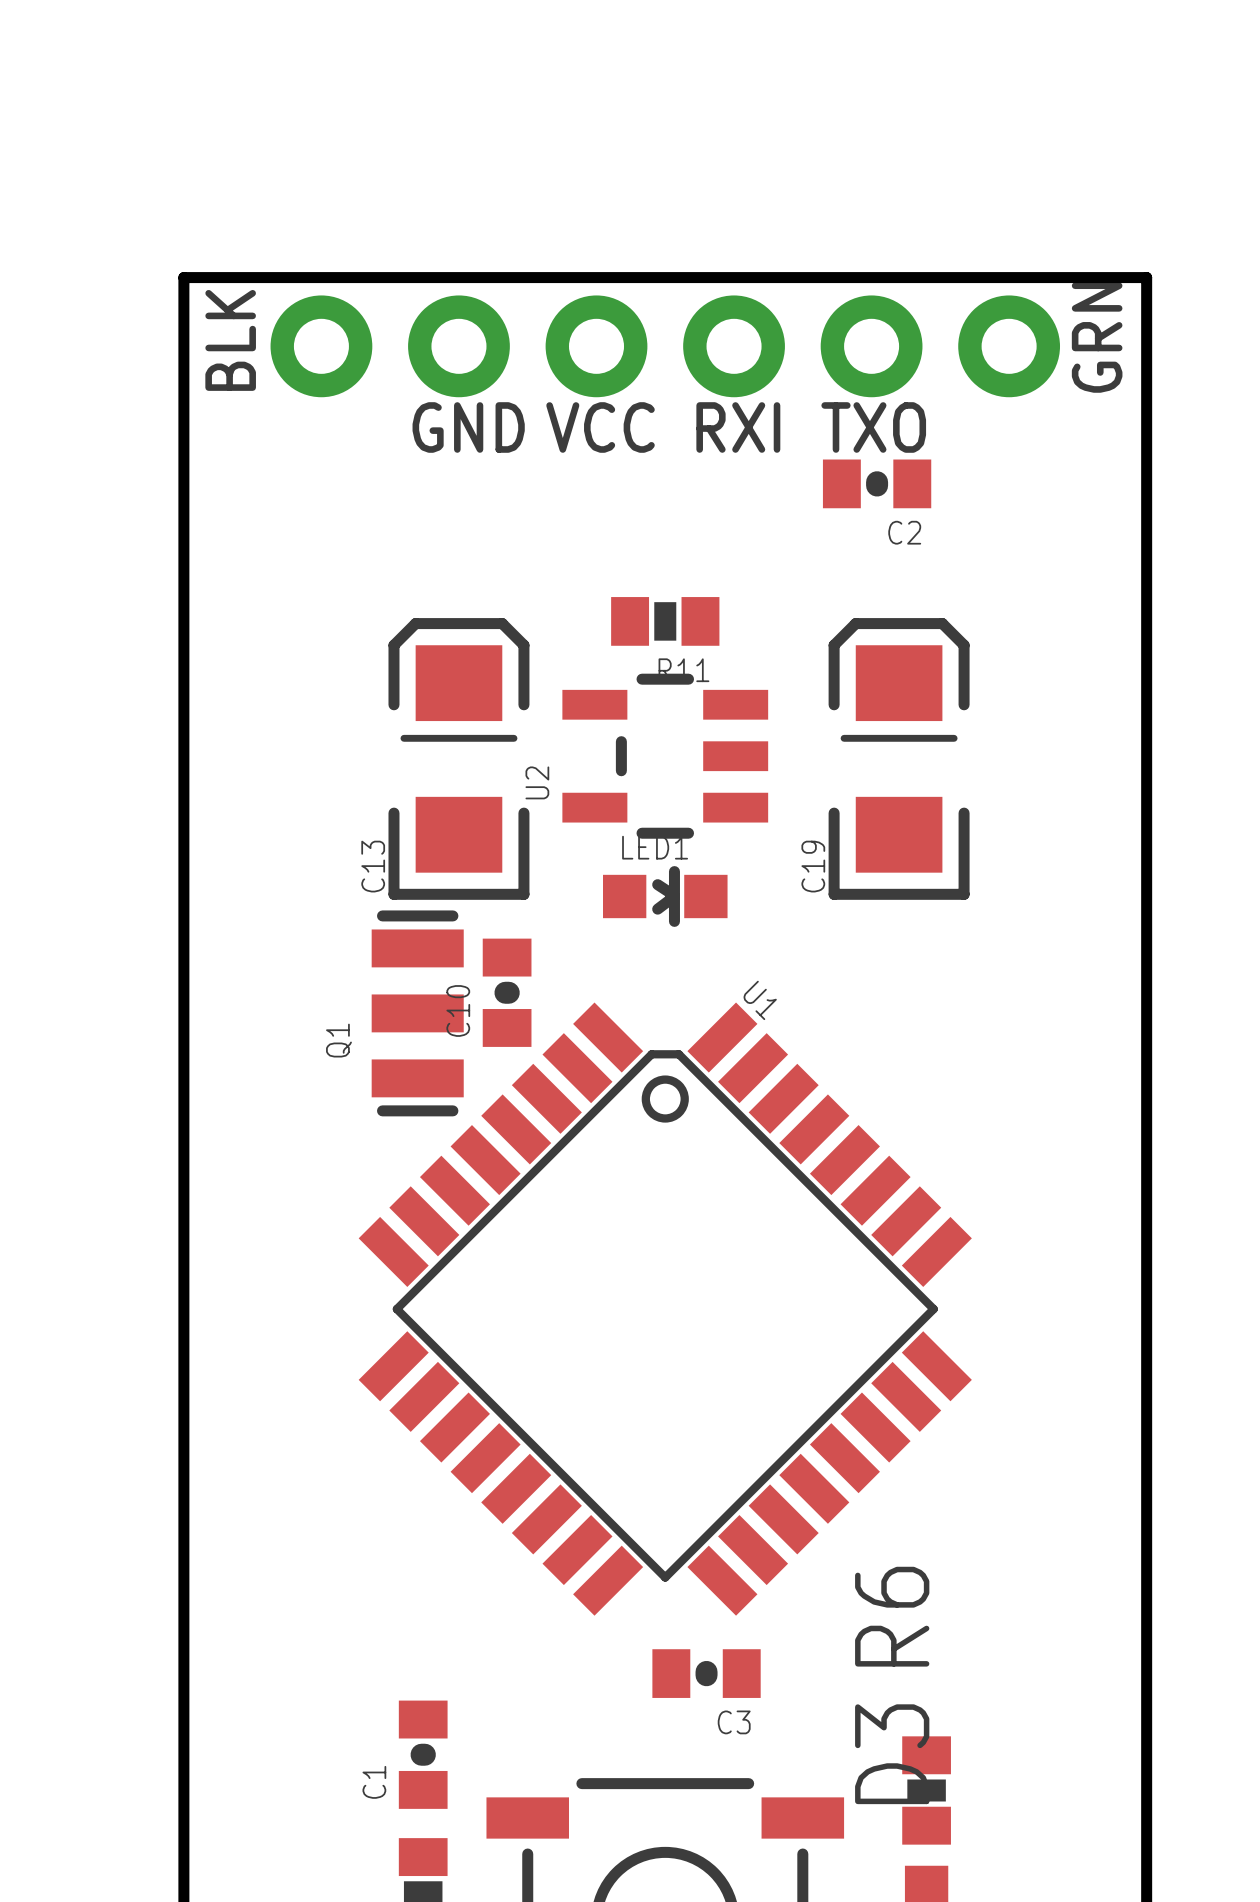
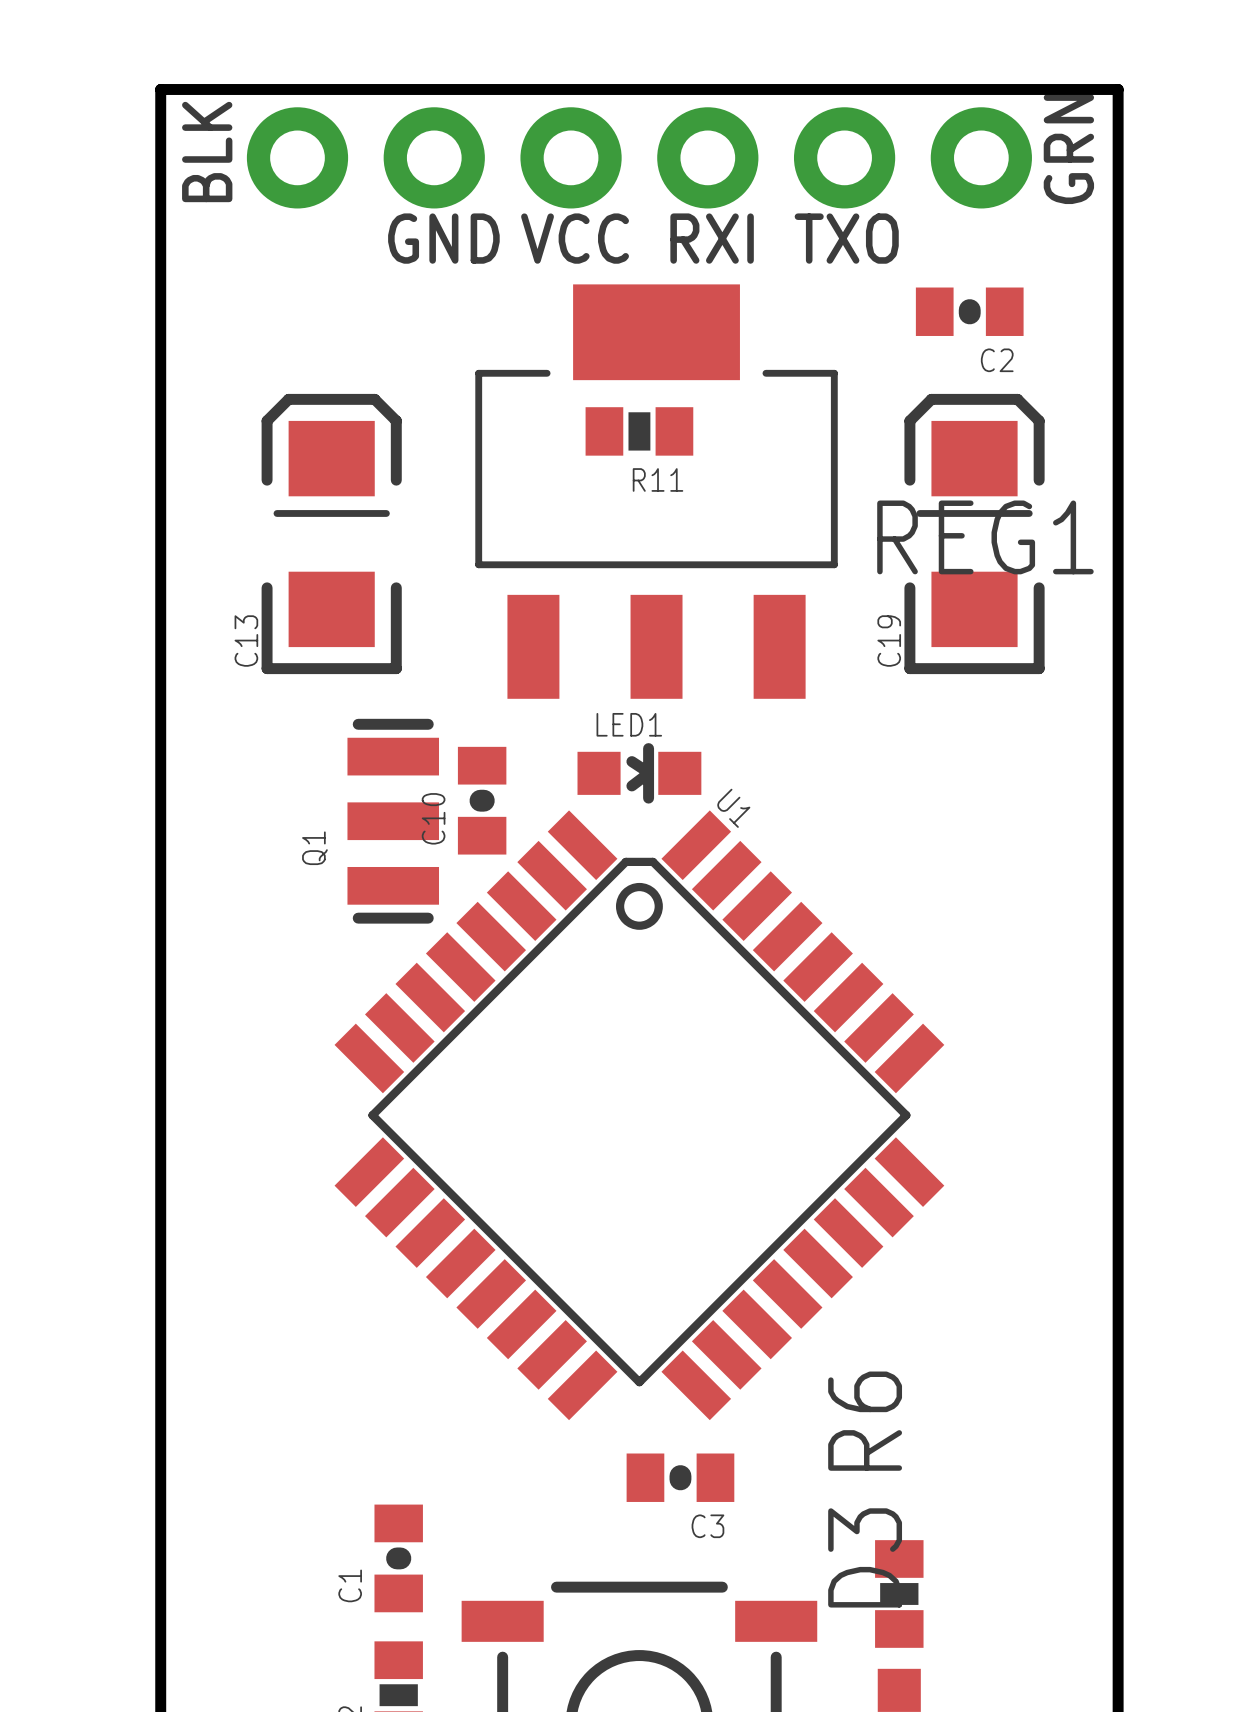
C2 position: (877, 483) -> (969, 311)
REG1: none -> (656, 491)
U2: (665, 756) -> none
C13 position: (458, 758) -> (331, 534)
C19 position: (899, 758) -> (974, 534)
LED1 position: (665, 896) -> (639, 773)

